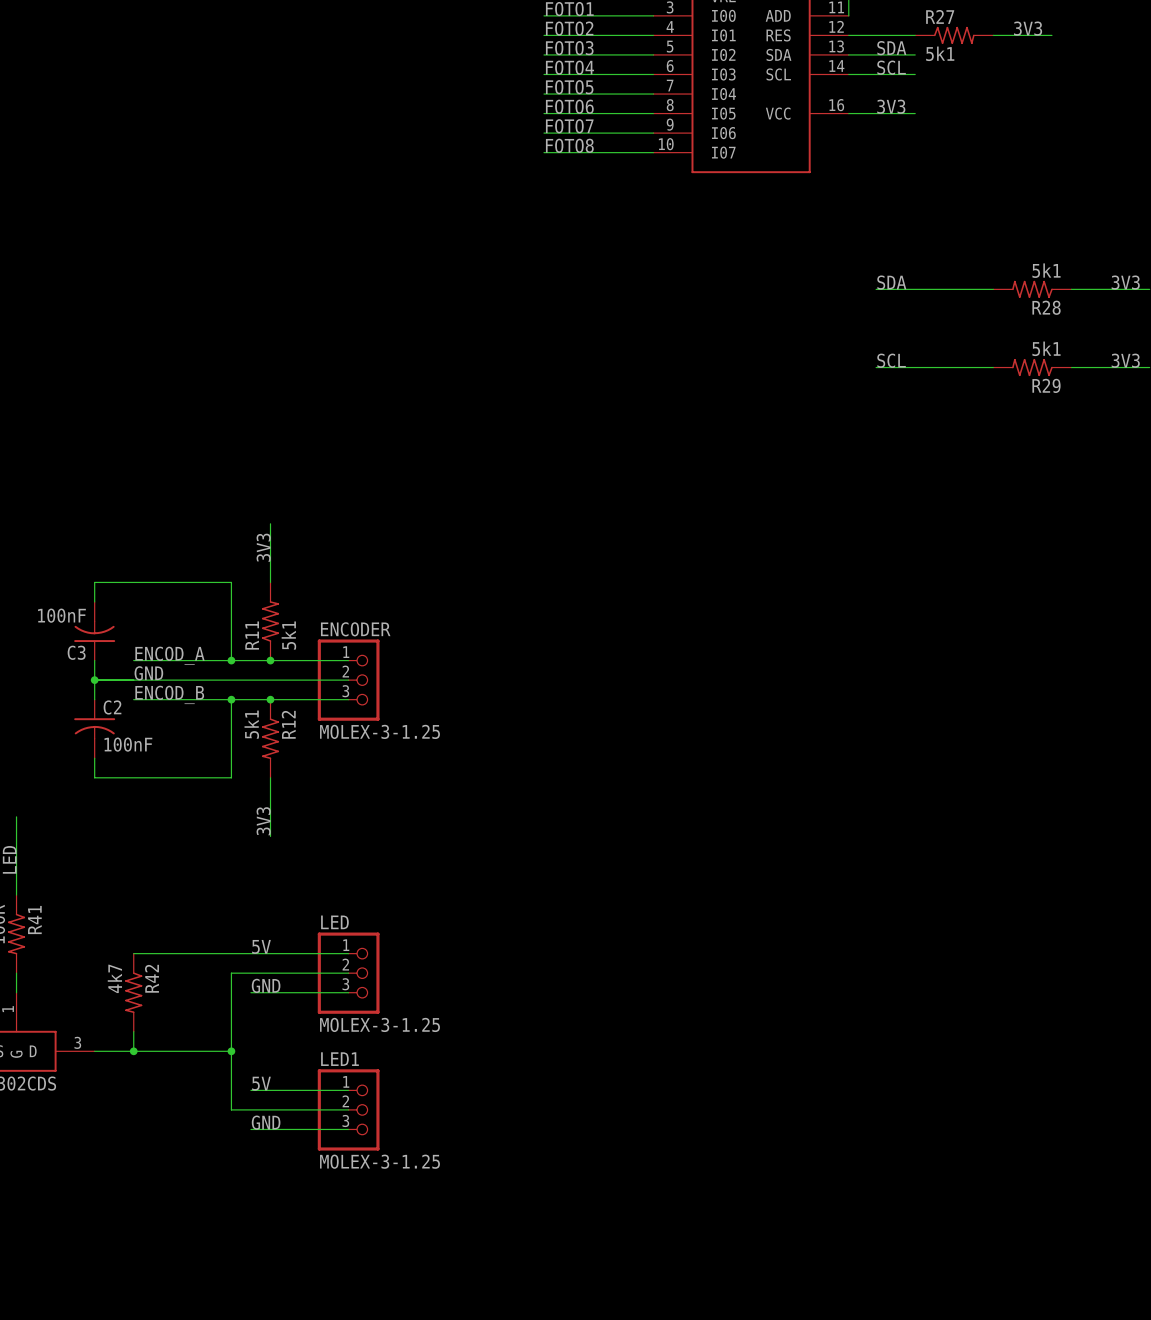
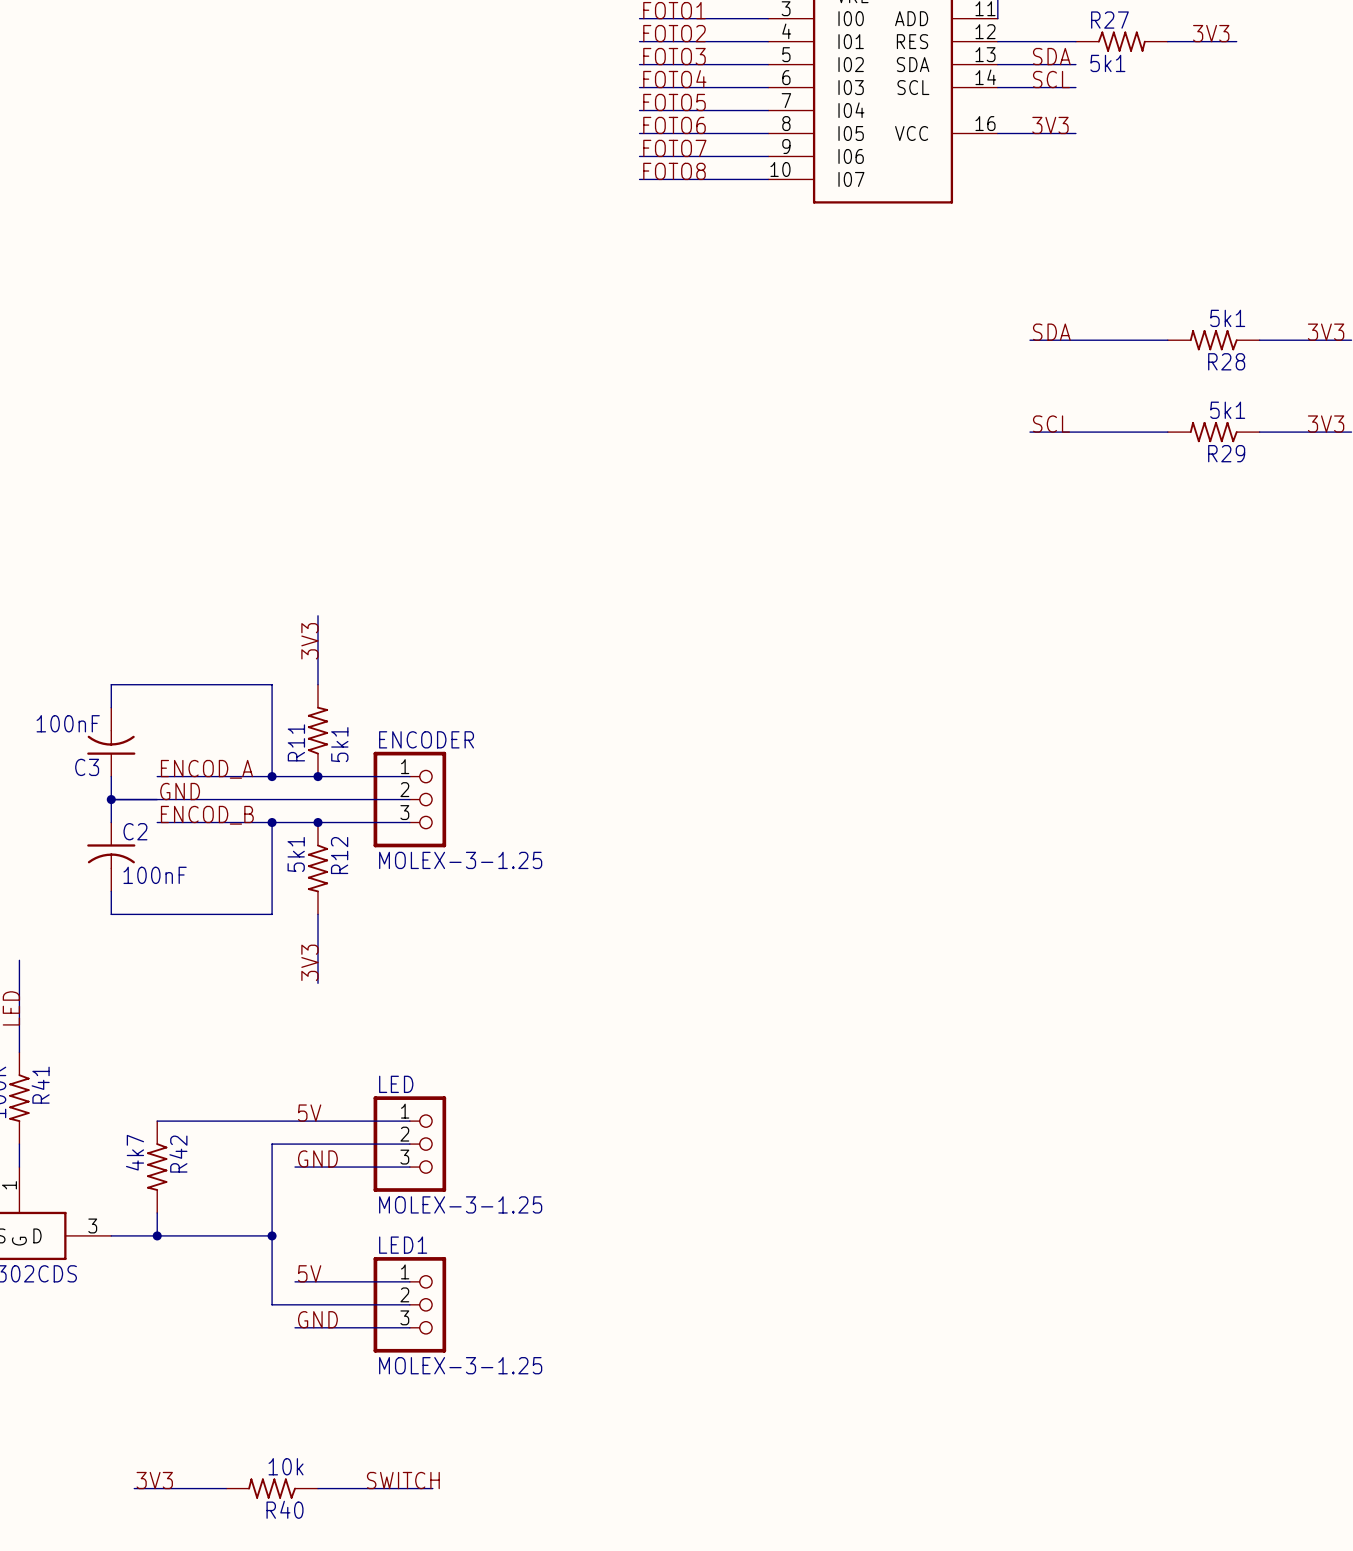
label: none -> 3V3 (154, 1480)
label: none -> SWITCH (403, 1480)
wire: none -> (134, 1488) (226, 1488)
R40: none -> 10k (272, 1488)
wire: none -> (318, 1488) (432, 1488)

